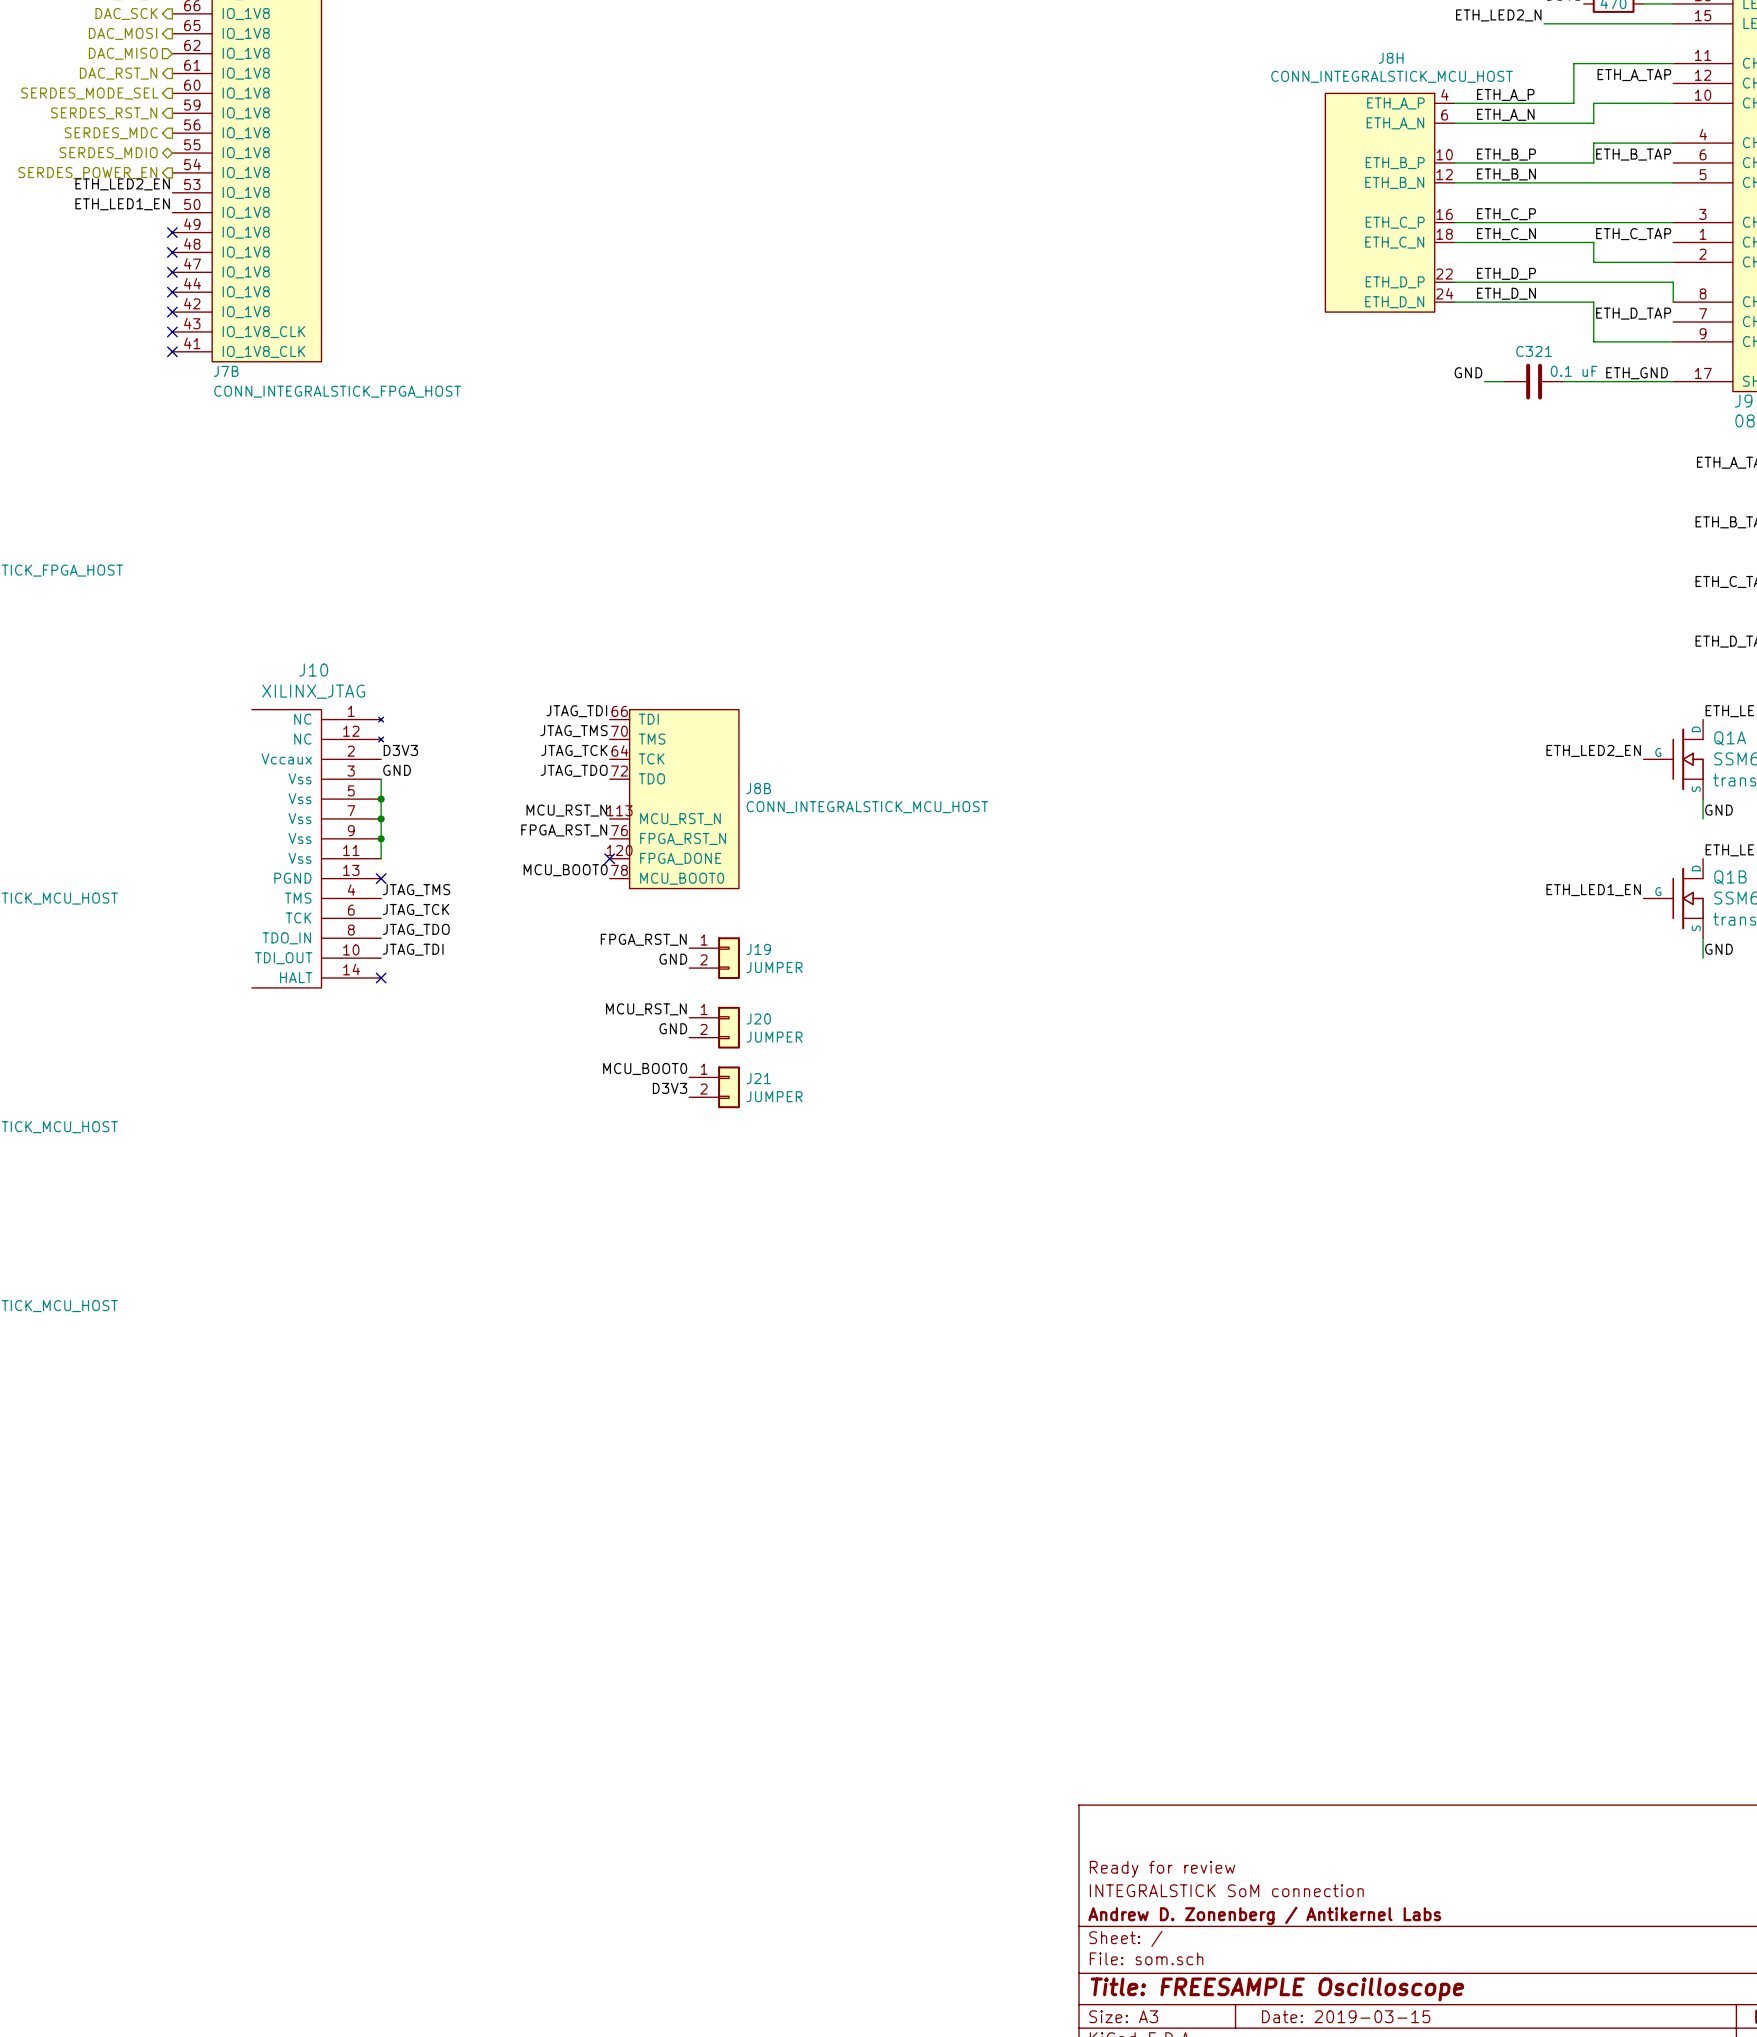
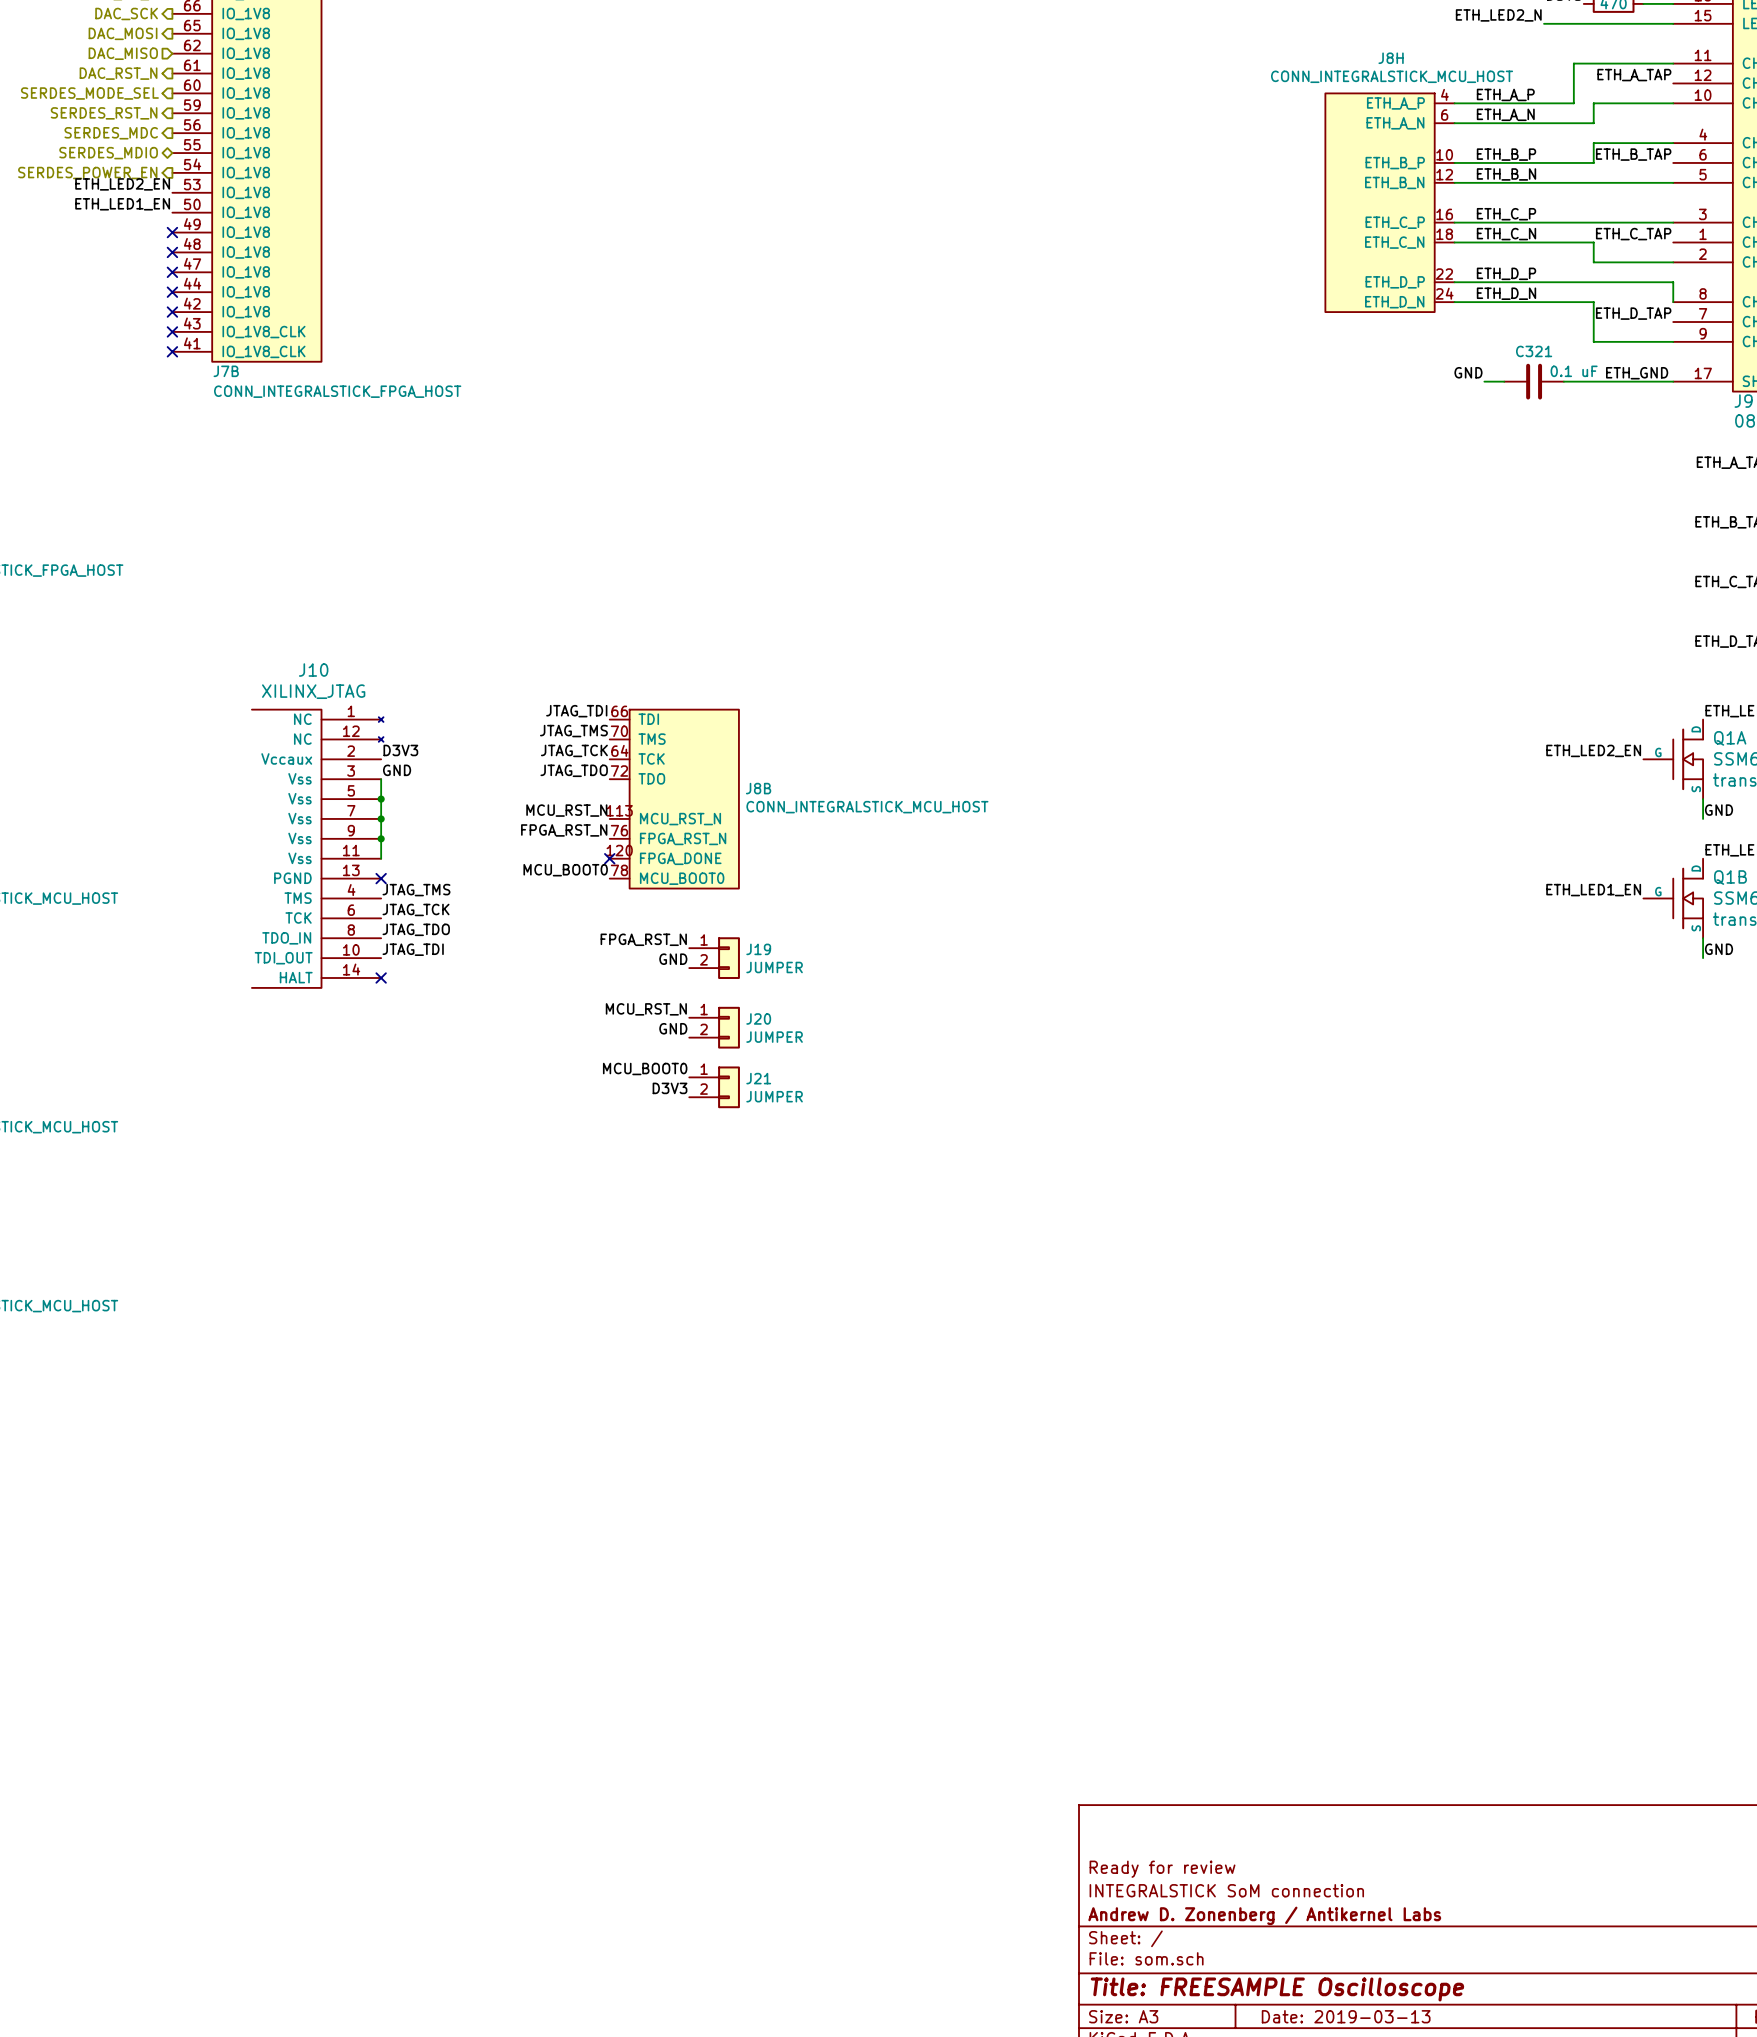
title block: Date: 2019-03-15 (1346, 2016) -> Date: 2019-03-13 (1346, 2016)

